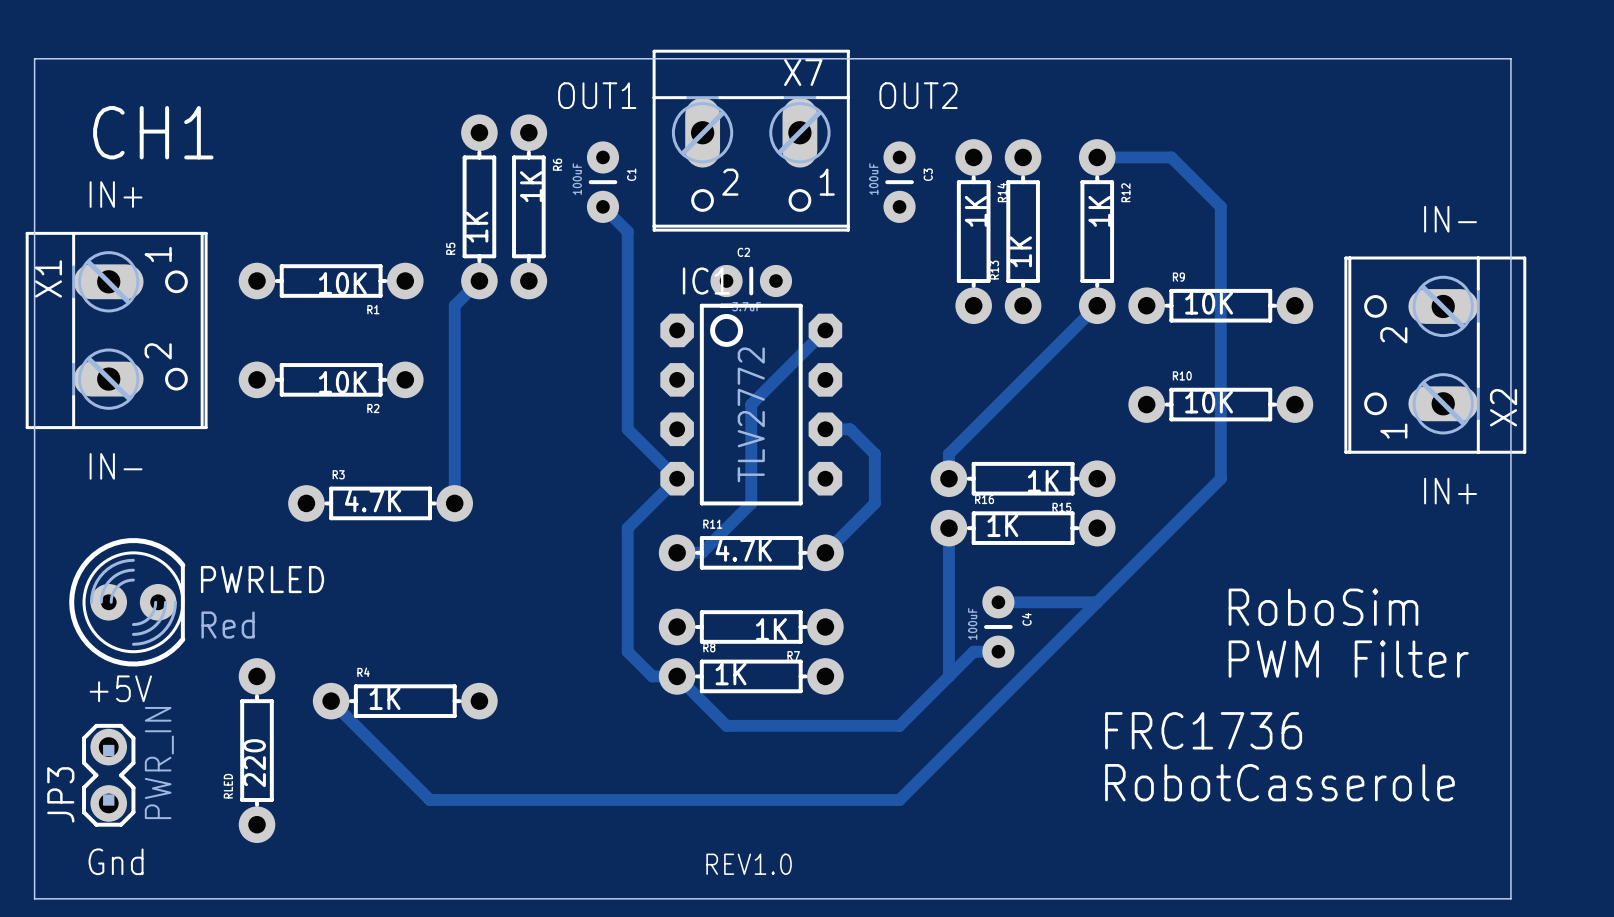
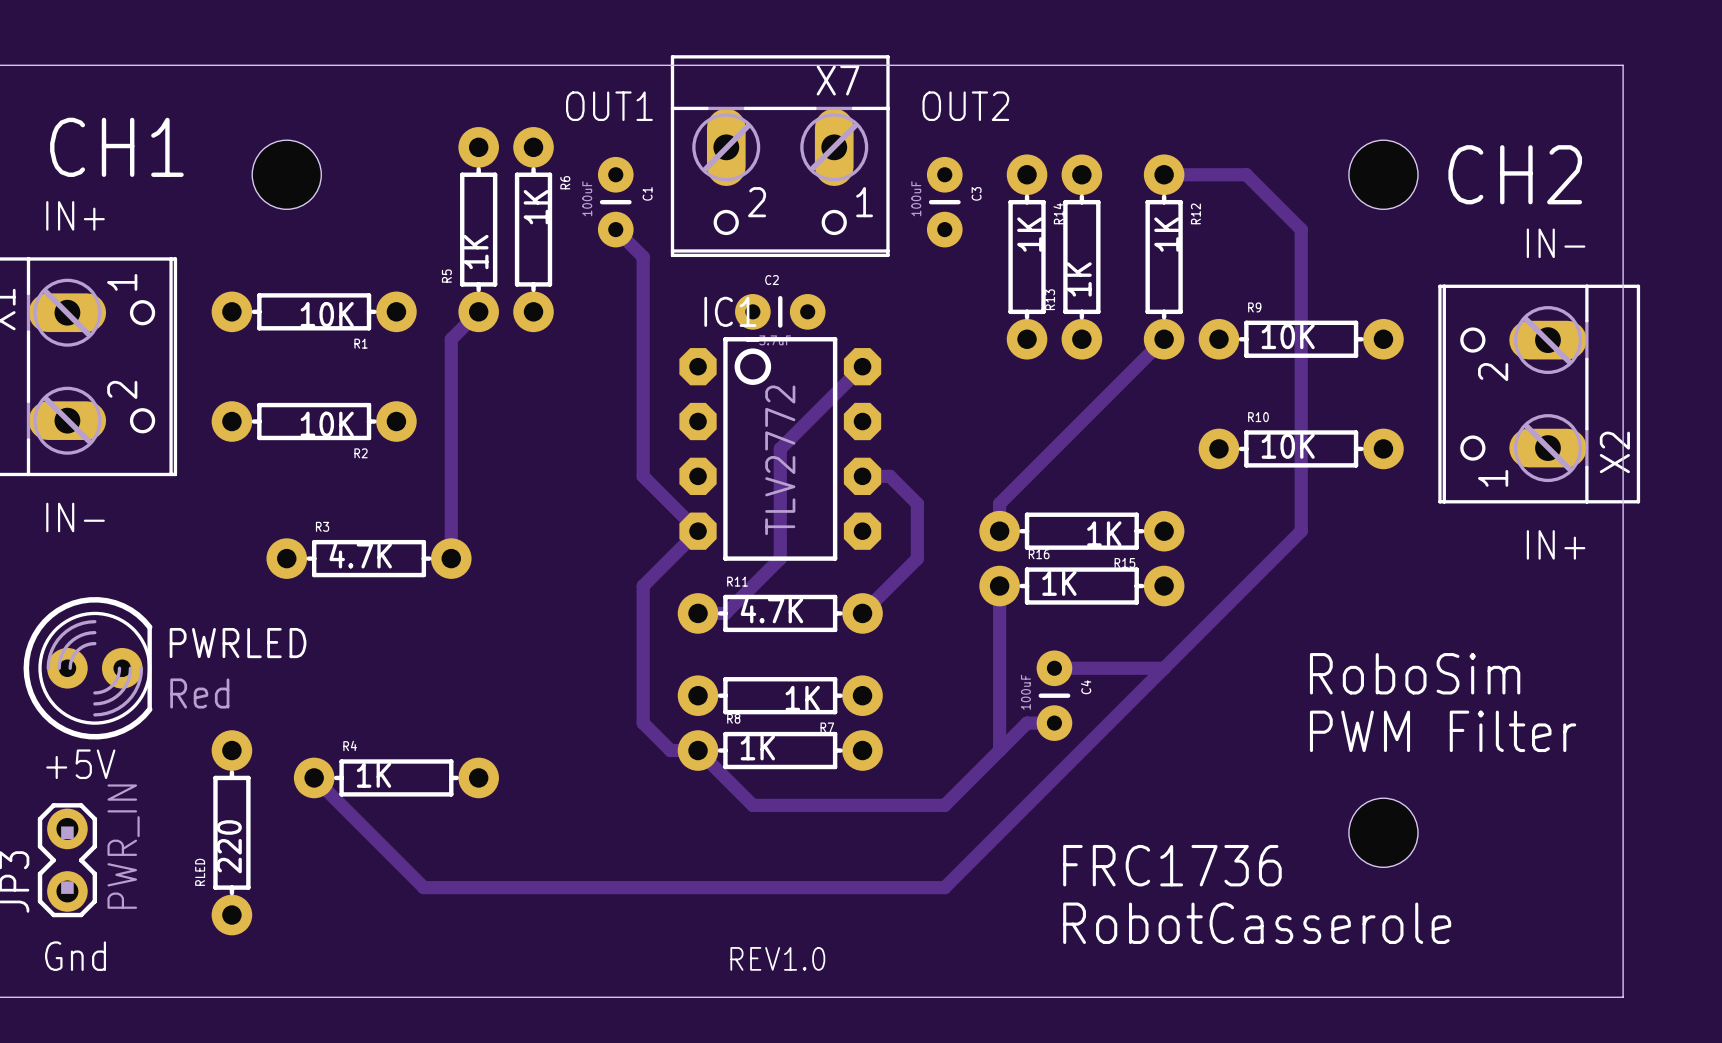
hole: none -> (286, 174)
hole: none -> (1383, 174)
text: none -> CH2 (1515, 174)
text position: FRC1736 (1203, 730) -> FRC1736 (1172, 865)
hole: none -> (1383, 832)
text position: RobotCasserole (1279, 782) -> RobotCasserole (1257, 923)

